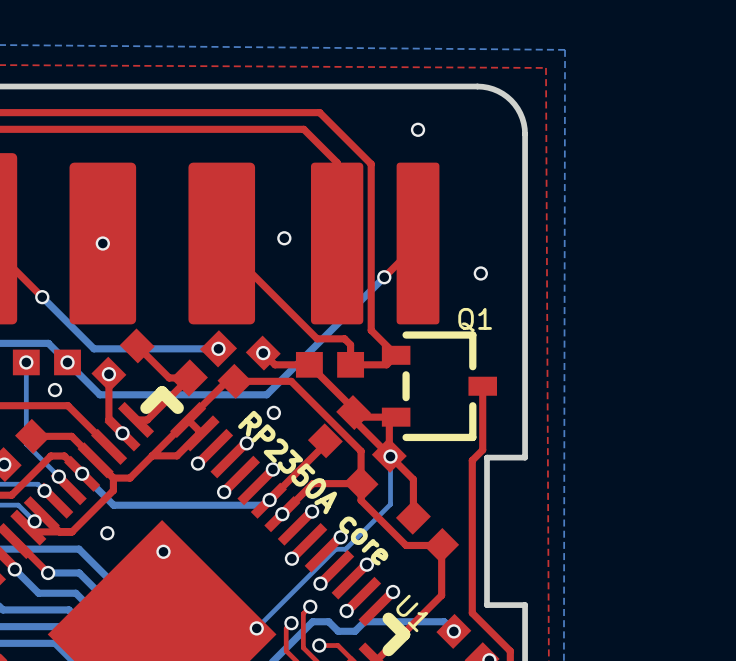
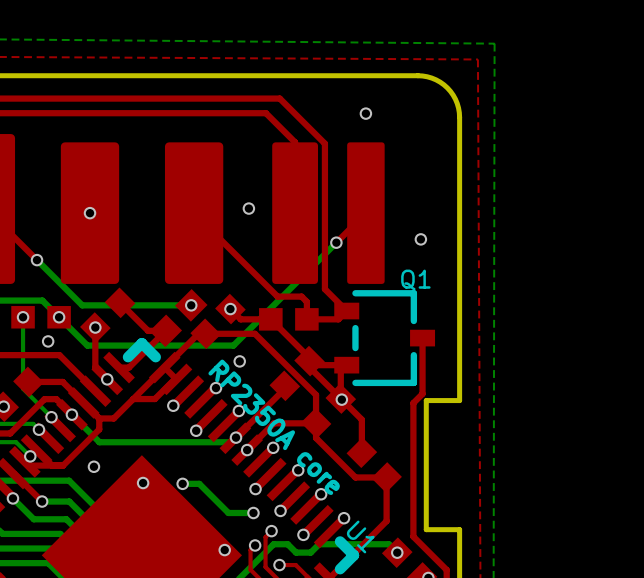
bottom track: (390, 456) (390, 504) (345, 549) (335, 549) (256, 628) -> none
bottom track: none -> (182, 483) (199, 483) (228, 513) (253, 513)
via: none -> (182, 483)
via: none -> (253, 513)

